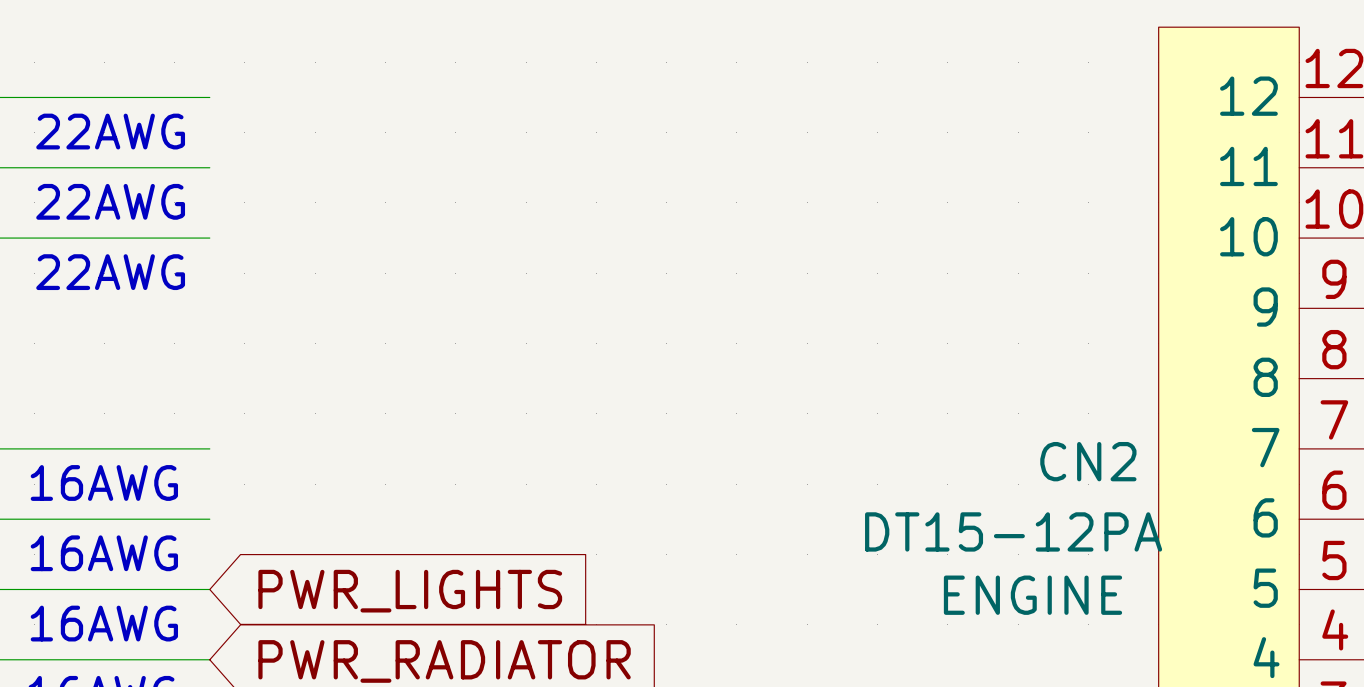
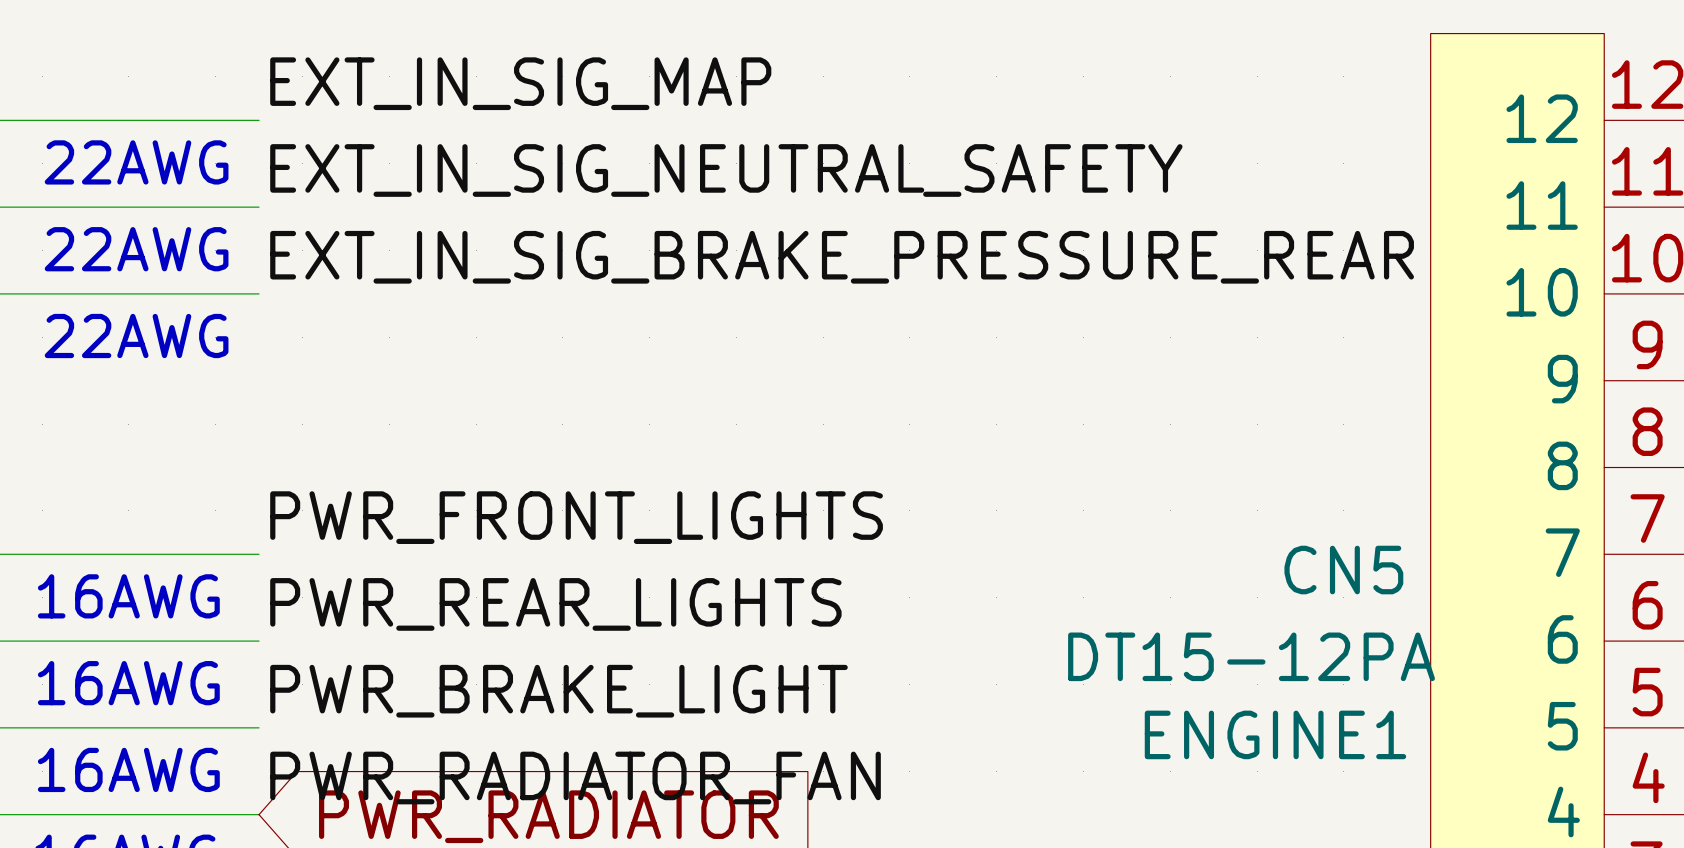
label: none -> EXT_IN_SIG_MAP (520, 83)
label: none -> EXT_IN_SIG_NEUTRAL_SAFETY (726, 170)
label: none -> EXT_IN_SIG_BRAKE_PRESSURE_REAR (842, 257)
label: none -> PWR_FRONT_LIGHTS (576, 517)
CN2 name: CN2 (1088, 461) -> CN5 (1343, 570)
label: none -> PWR_REAR_LIGHTS (555, 604)
label: none -> PWR_BRAKE_LIGHT (558, 691)
global label: PWR_LIGHTS (410, 591) -> none
CN2 text: ENGINE (1032, 595) -> ENGINE1 (1275, 734)
label: none -> PWR_RADIATOR_FAN (575, 777)

